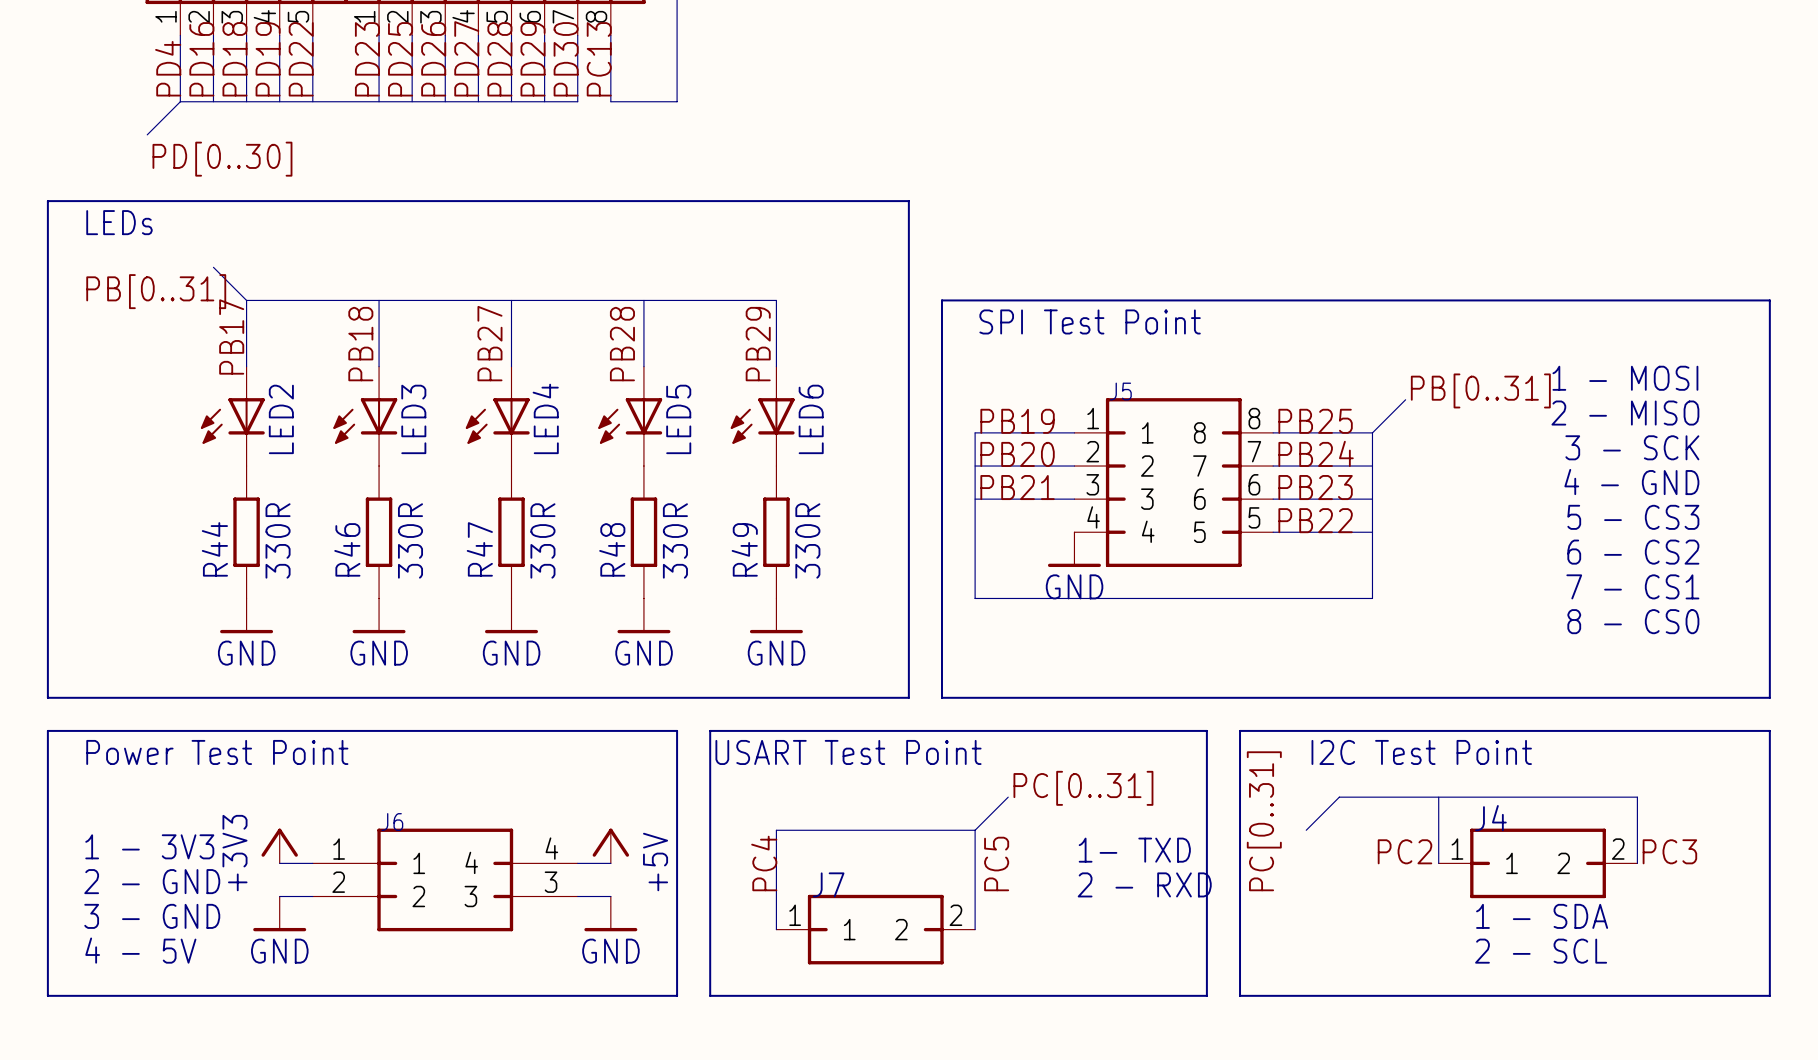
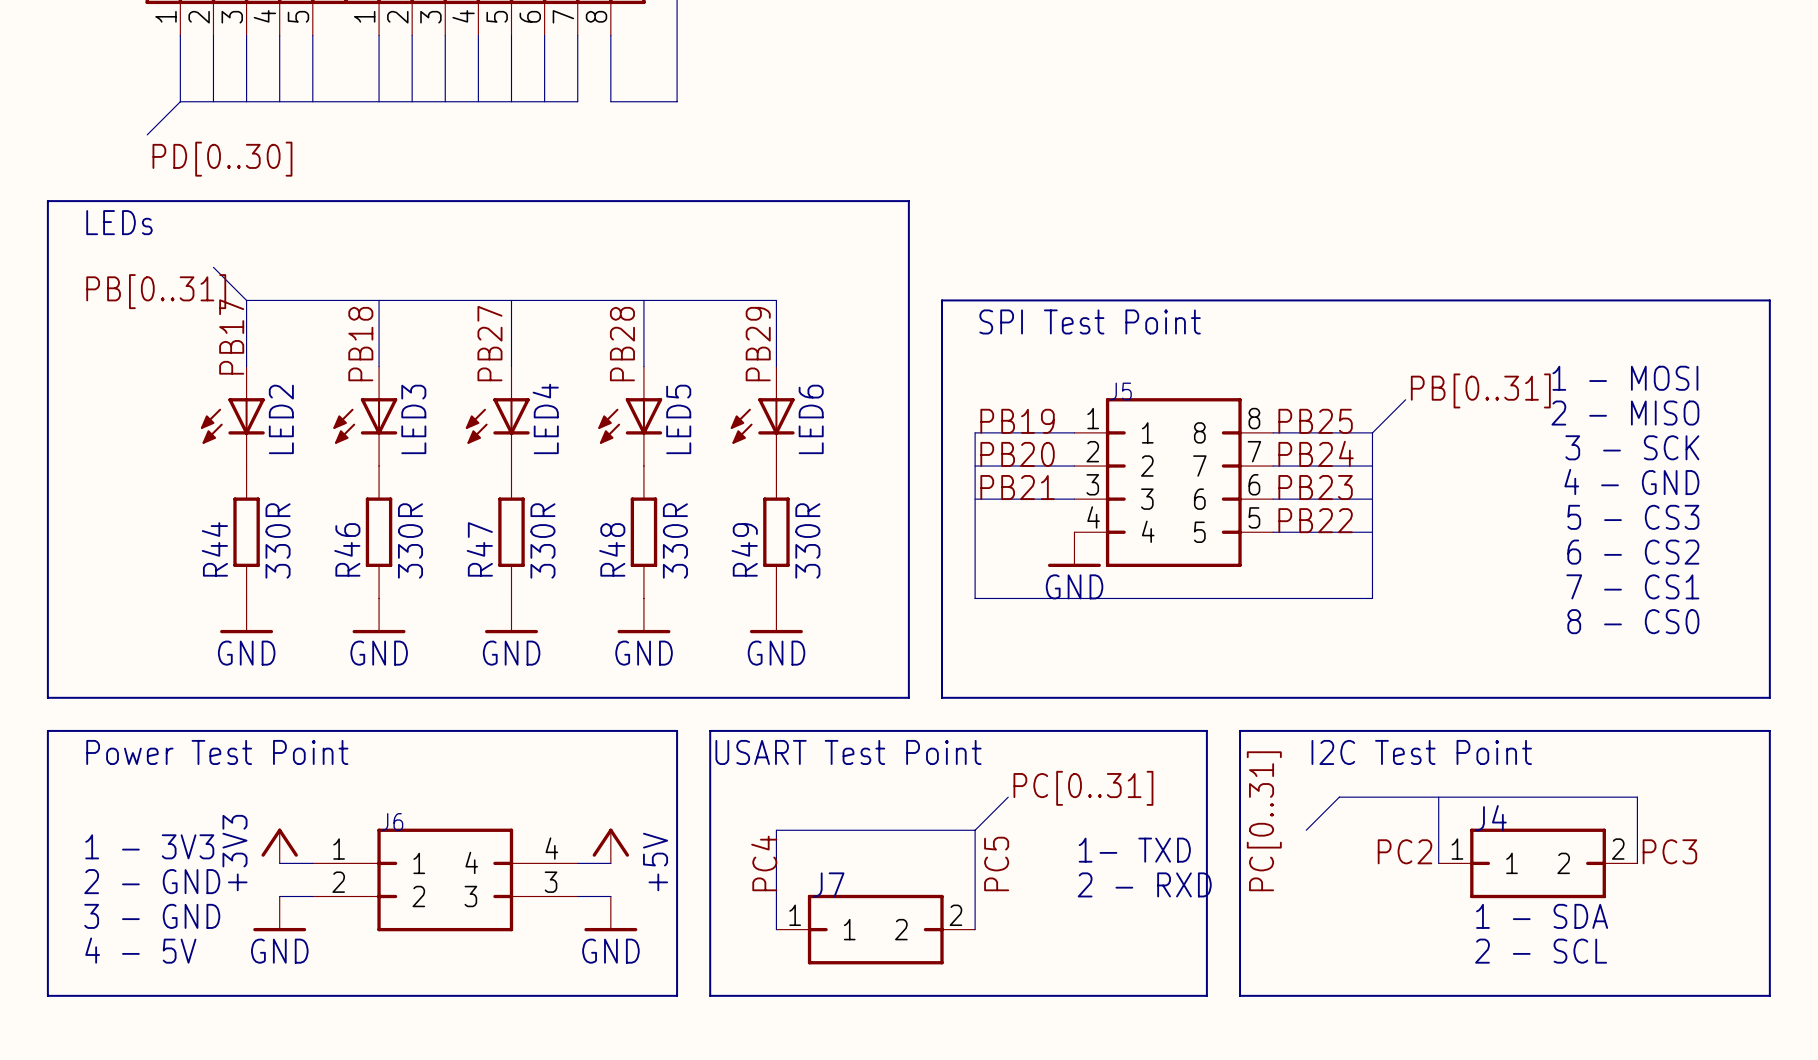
label: PD27 (466, 58) -> none
label: PD16 (201, 59) -> none
label: PD18 (234, 59) -> none
label: PD19 (268, 59) -> none
label: PD22 (301, 59) -> none
label: PD23 (367, 59) -> none
label: PD25 (400, 59) -> none
label: PD26 (433, 59) -> none
label: PD28 (499, 59) -> none
label: PD29 (533, 59) -> none
label: PD30 (566, 59) -> none
label: PC13 (599, 59) -> none
label: PD4 (168, 68) -> none

